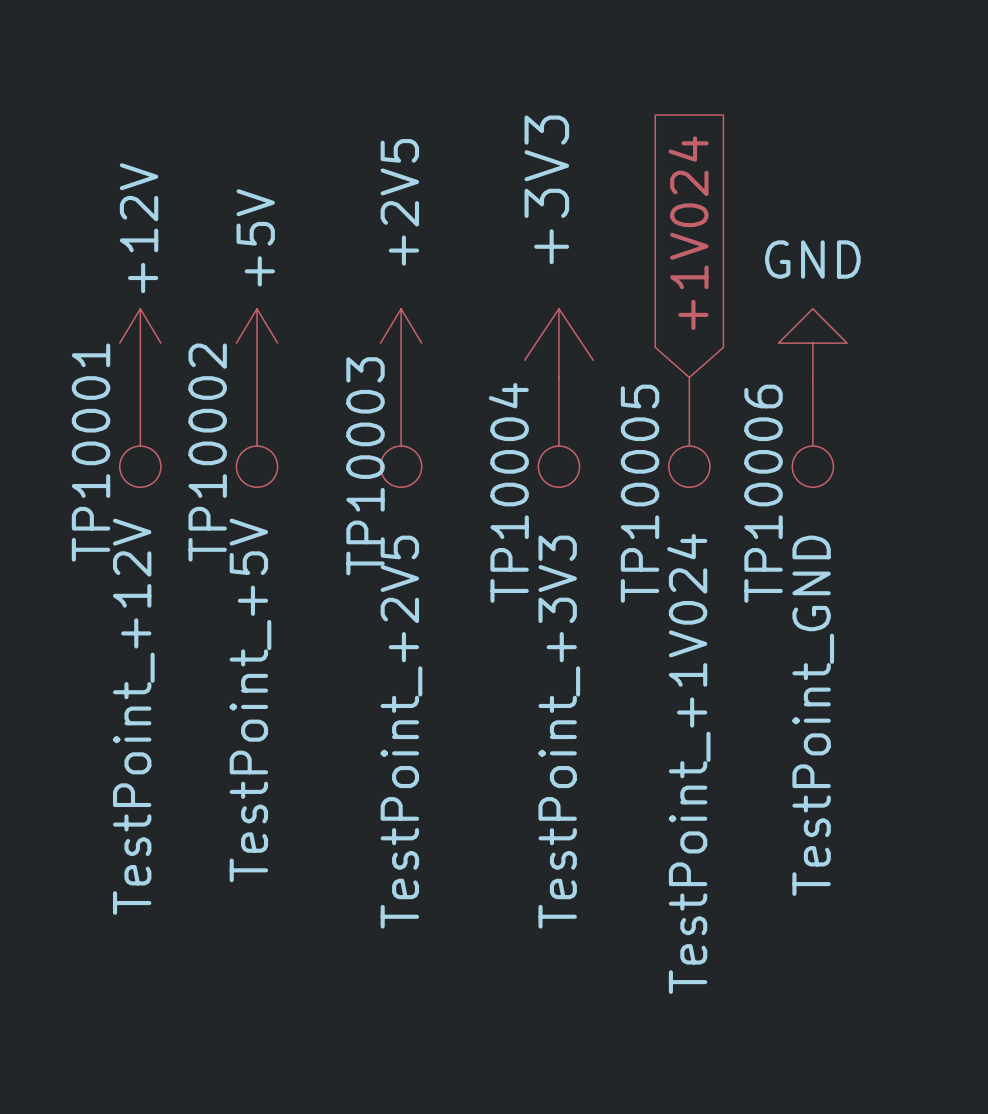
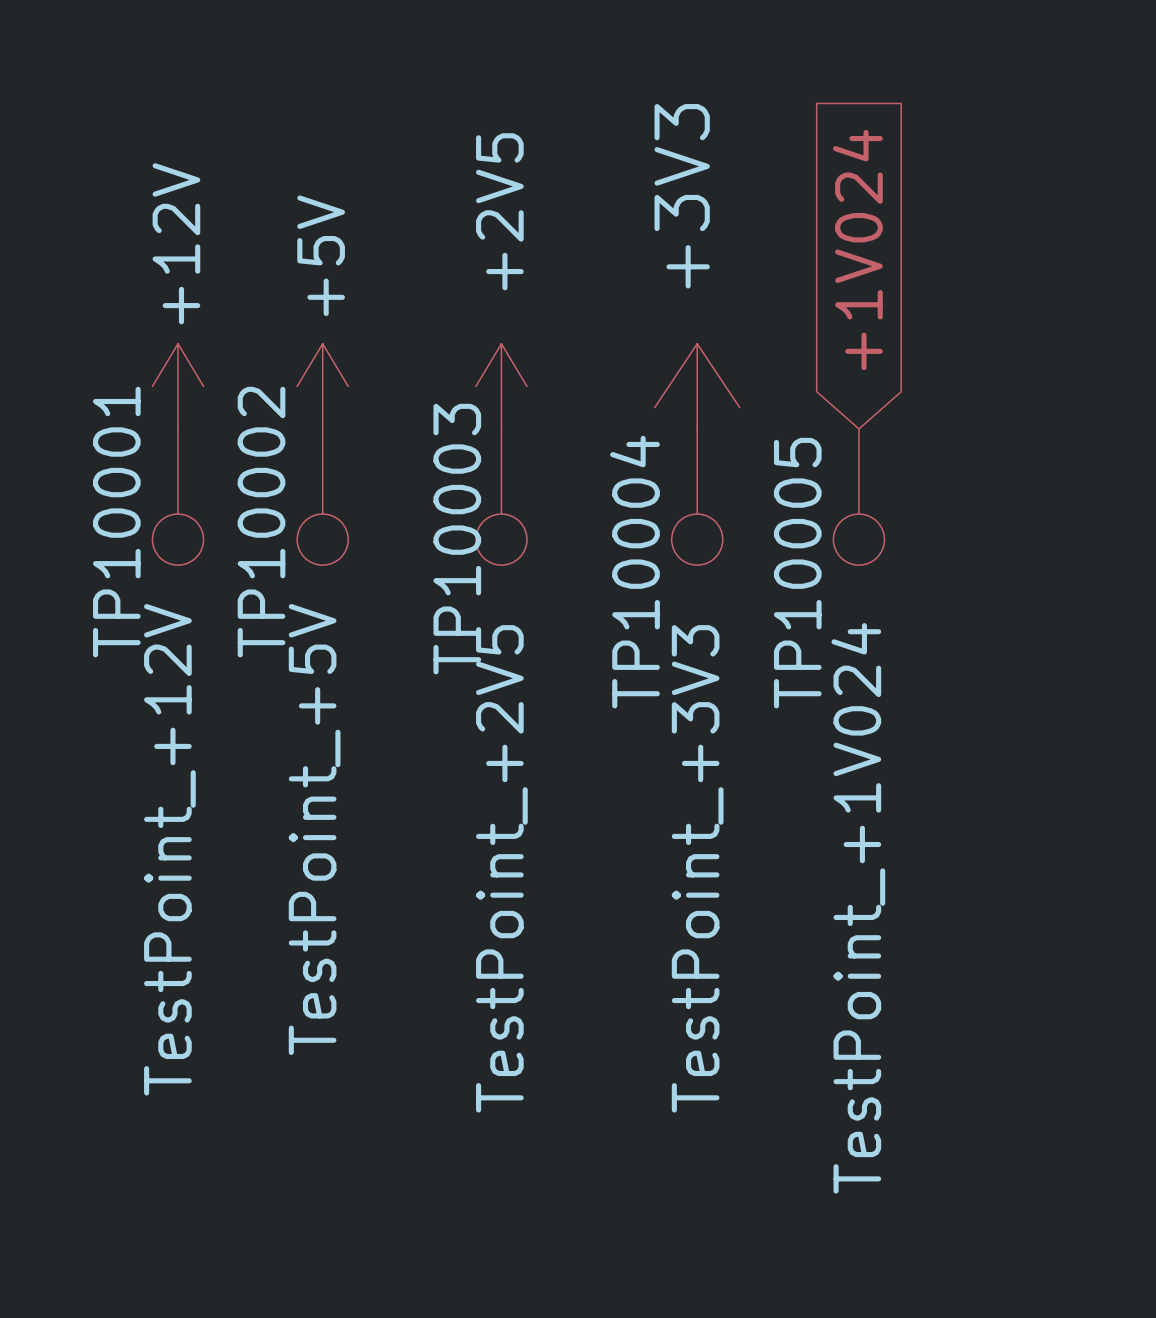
power symbol: GND (812, 343) -> none
TP10006: TestPoint_GND (812, 432) -> none

